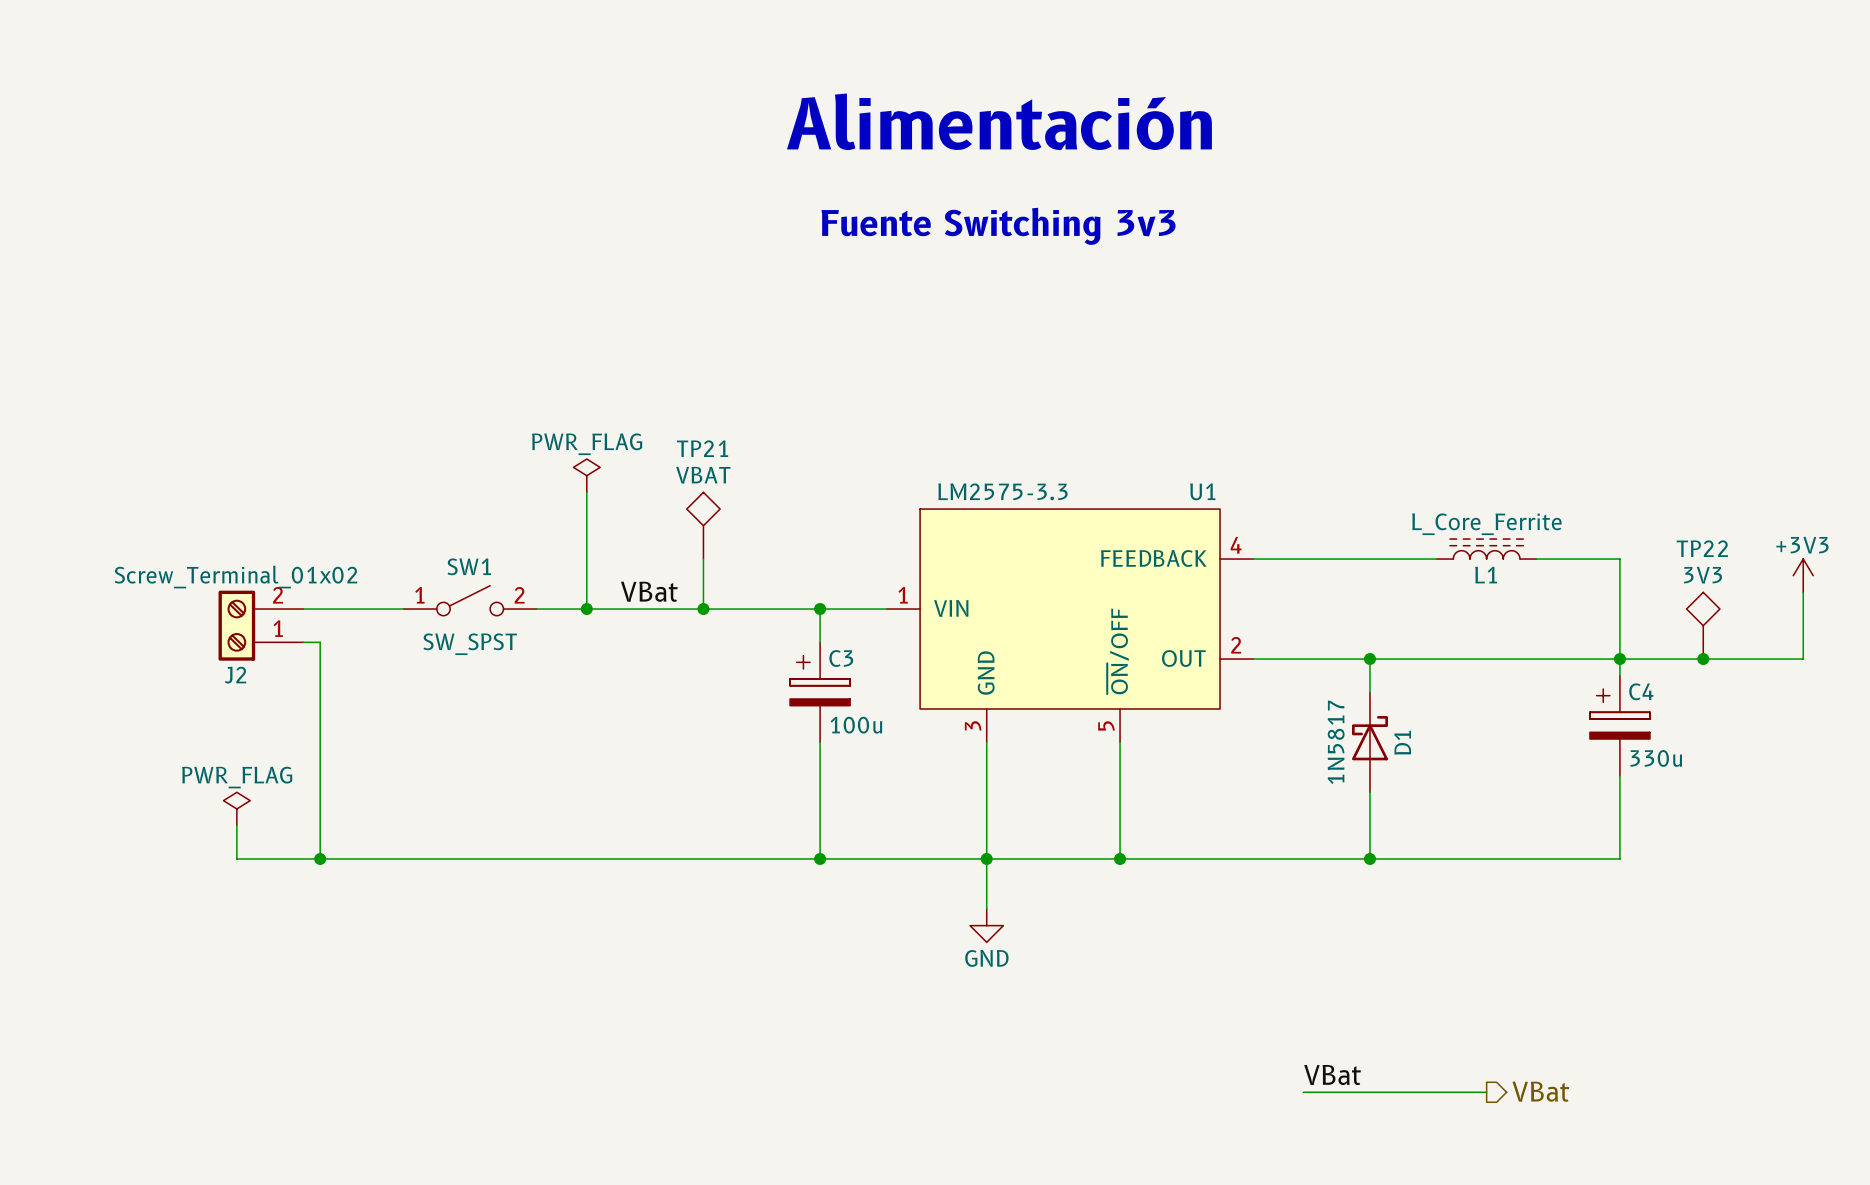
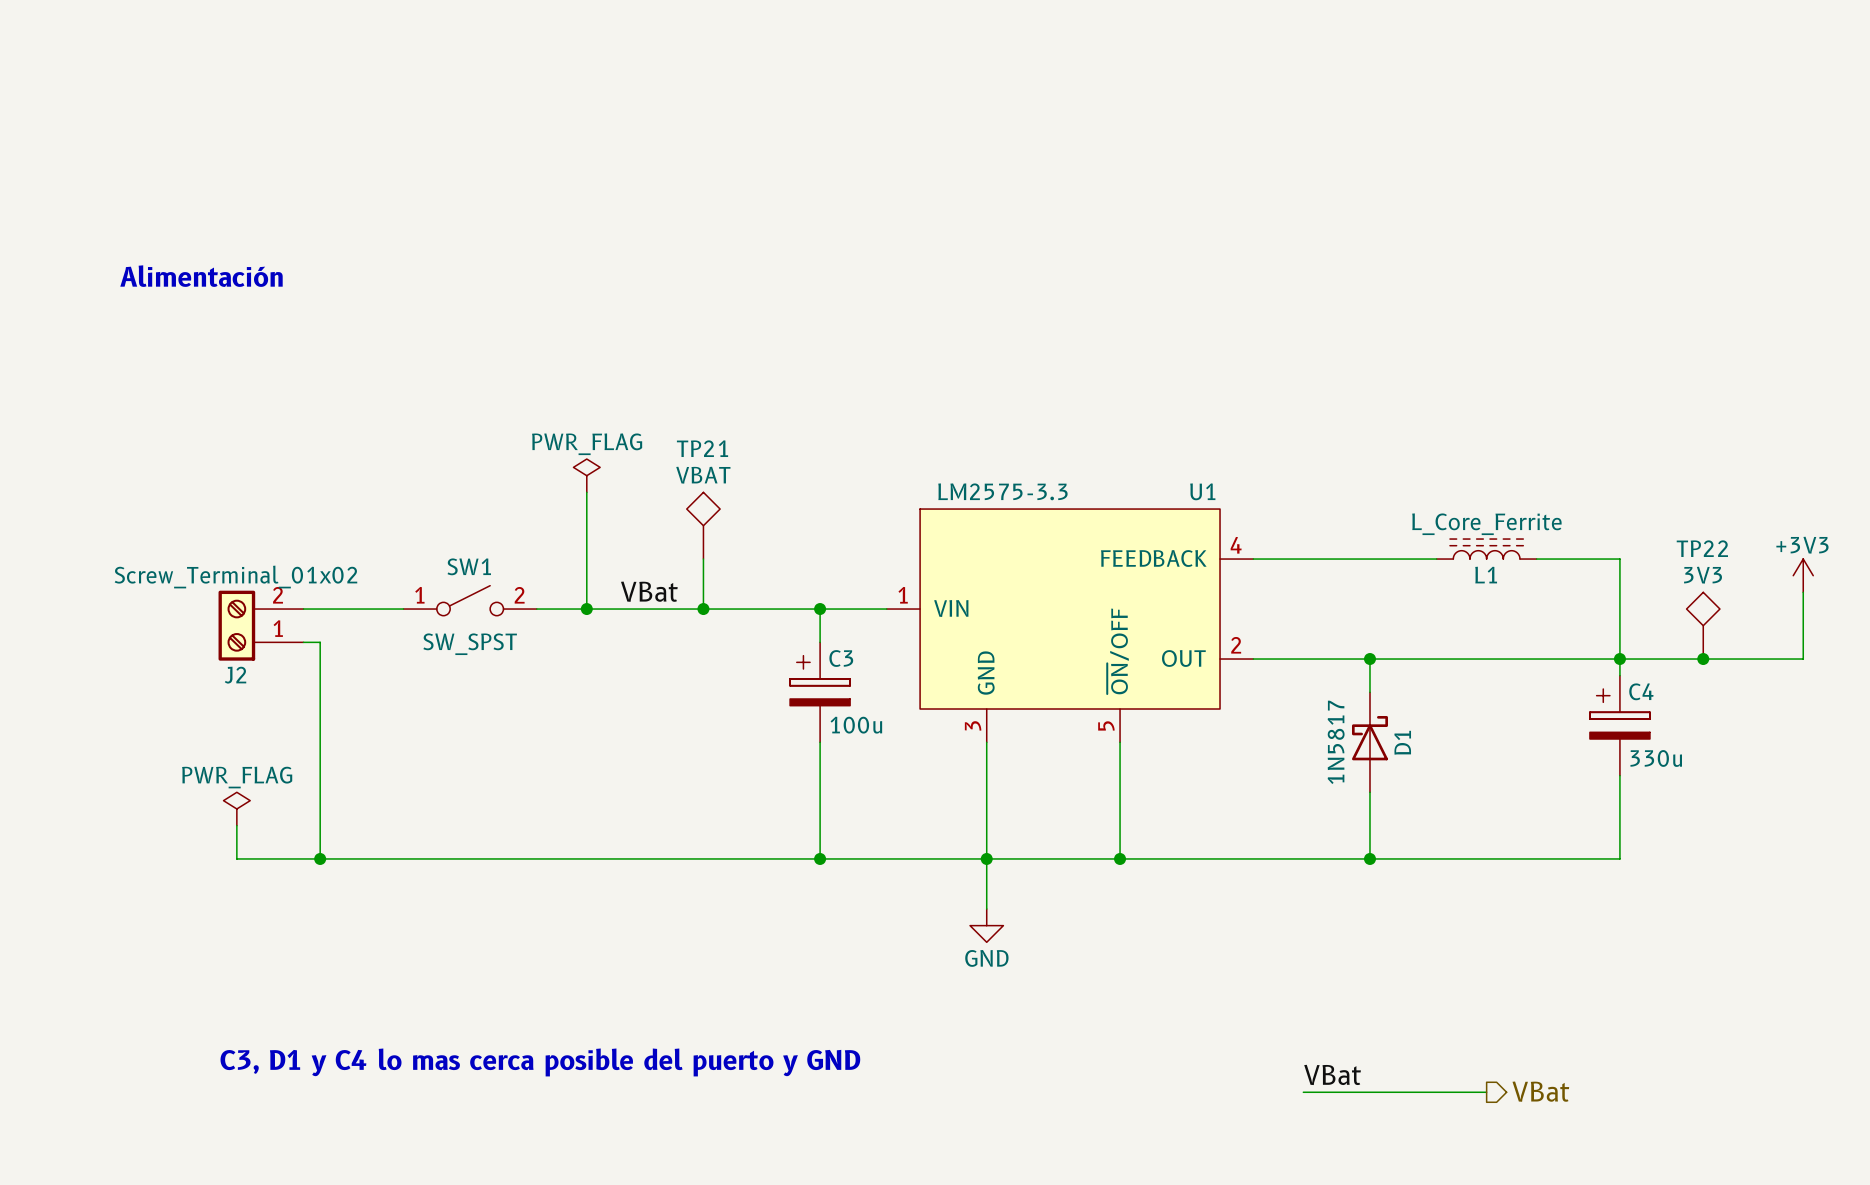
text: Alimentación (999, 121) -> none
text: Fuente Switching 3v3 (998, 226) -> none
text: none -> Alimentación (201, 276)
text: none -> C3, D1 y C4 lo mas cerca posible del puerto y GND (540, 1062)

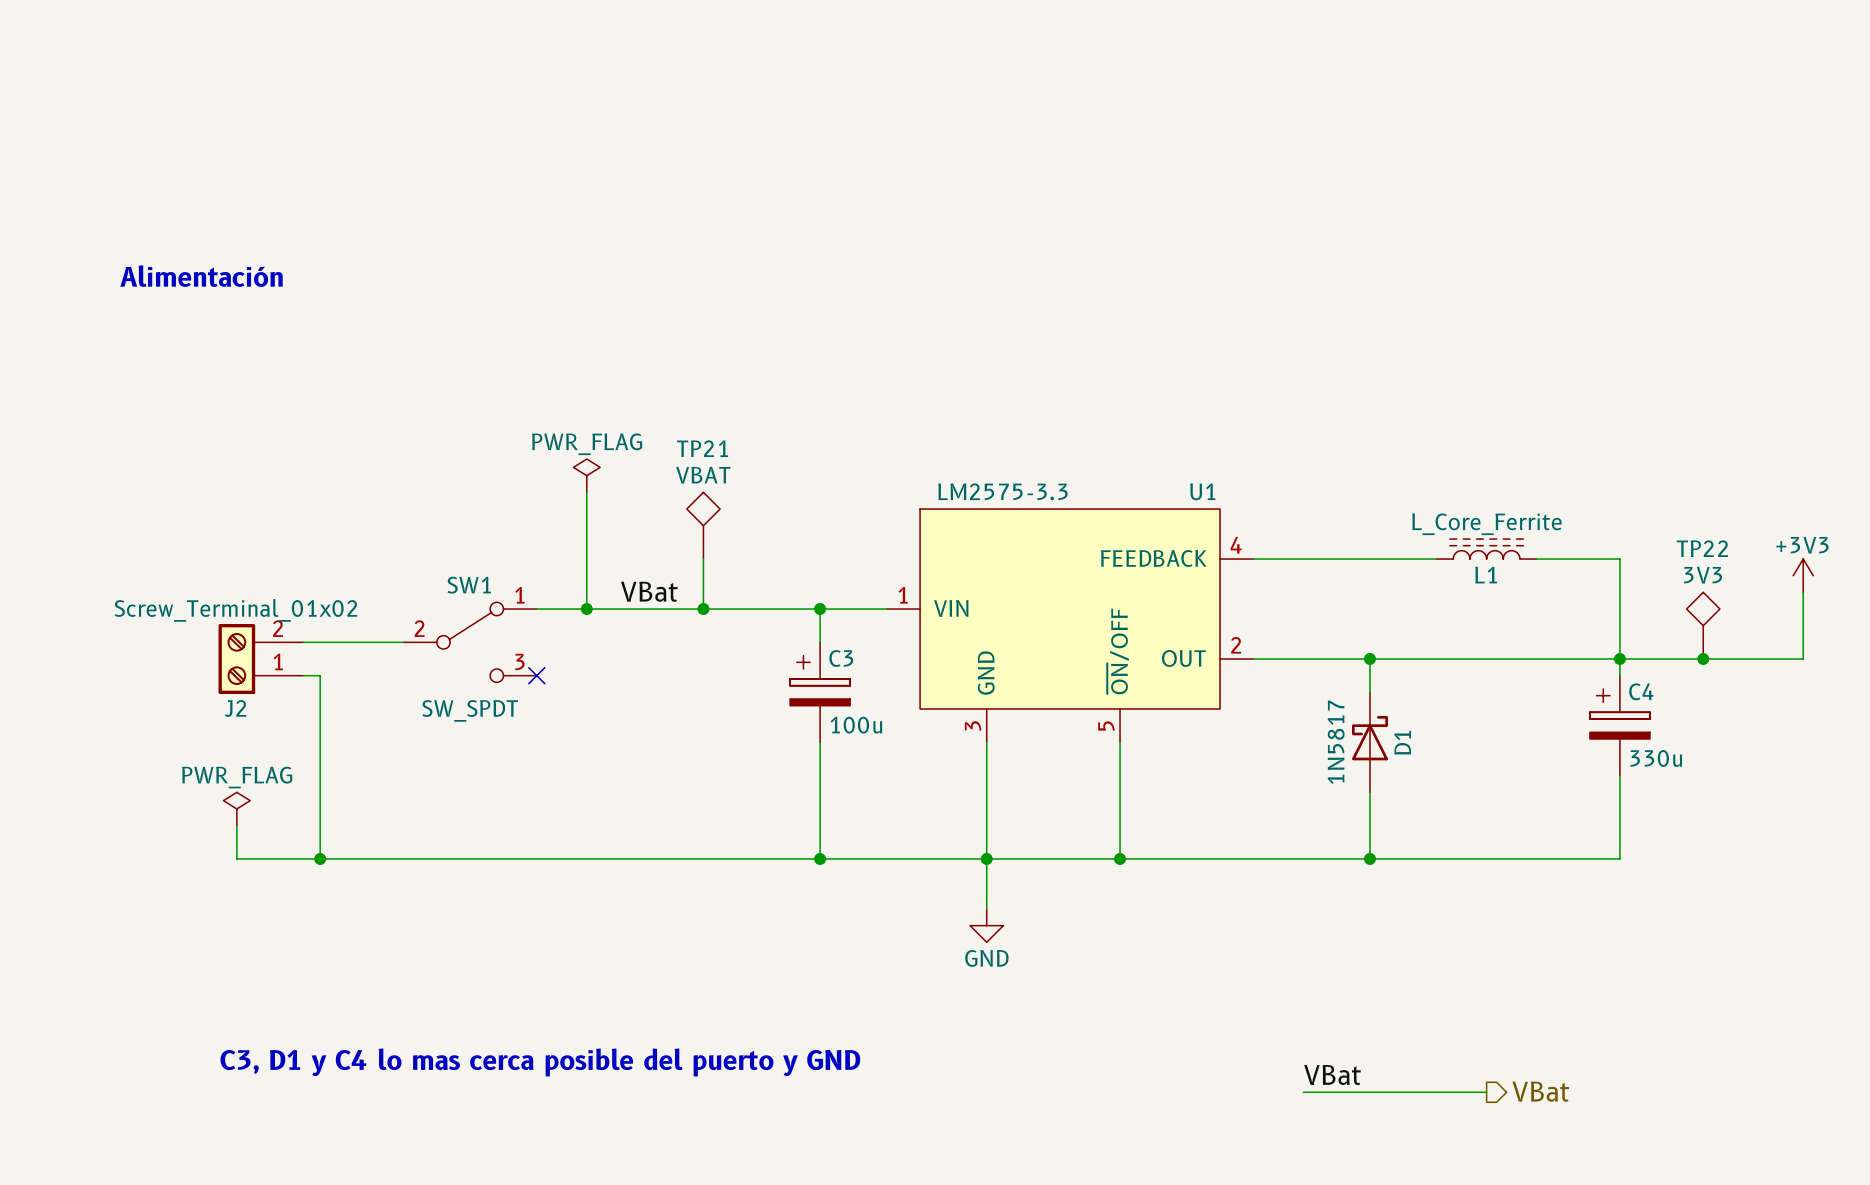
SW1 symbol: [403, 585, 537, 616] -> [403, 602, 537, 683]
wire: (303, 609) (403, 609) -> none
J2 position: (261, 625) -> (261, 659)
wire: (320, 642) (320, 675) -> (303, 675) (320, 675)
wire: none -> (320, 642) (403, 642)
SW1 value: SW_SPST (470, 644) -> SW_SPDT (470, 710)
no-connect mark: none -> (536, 675)

